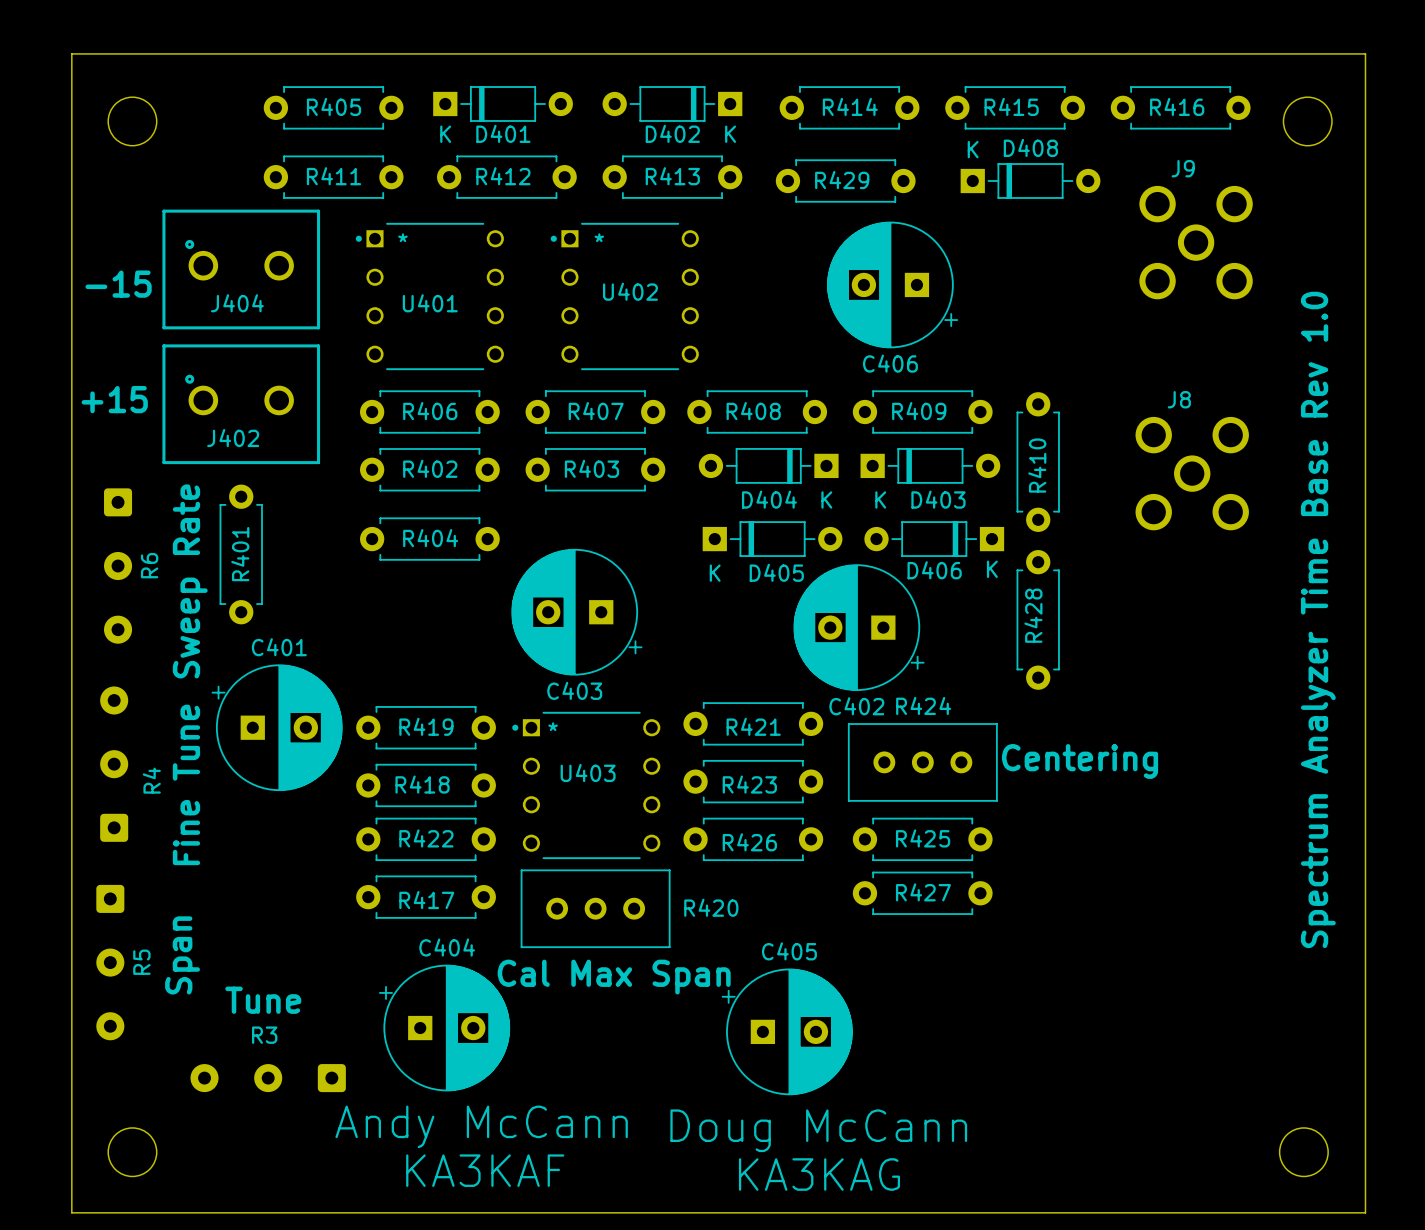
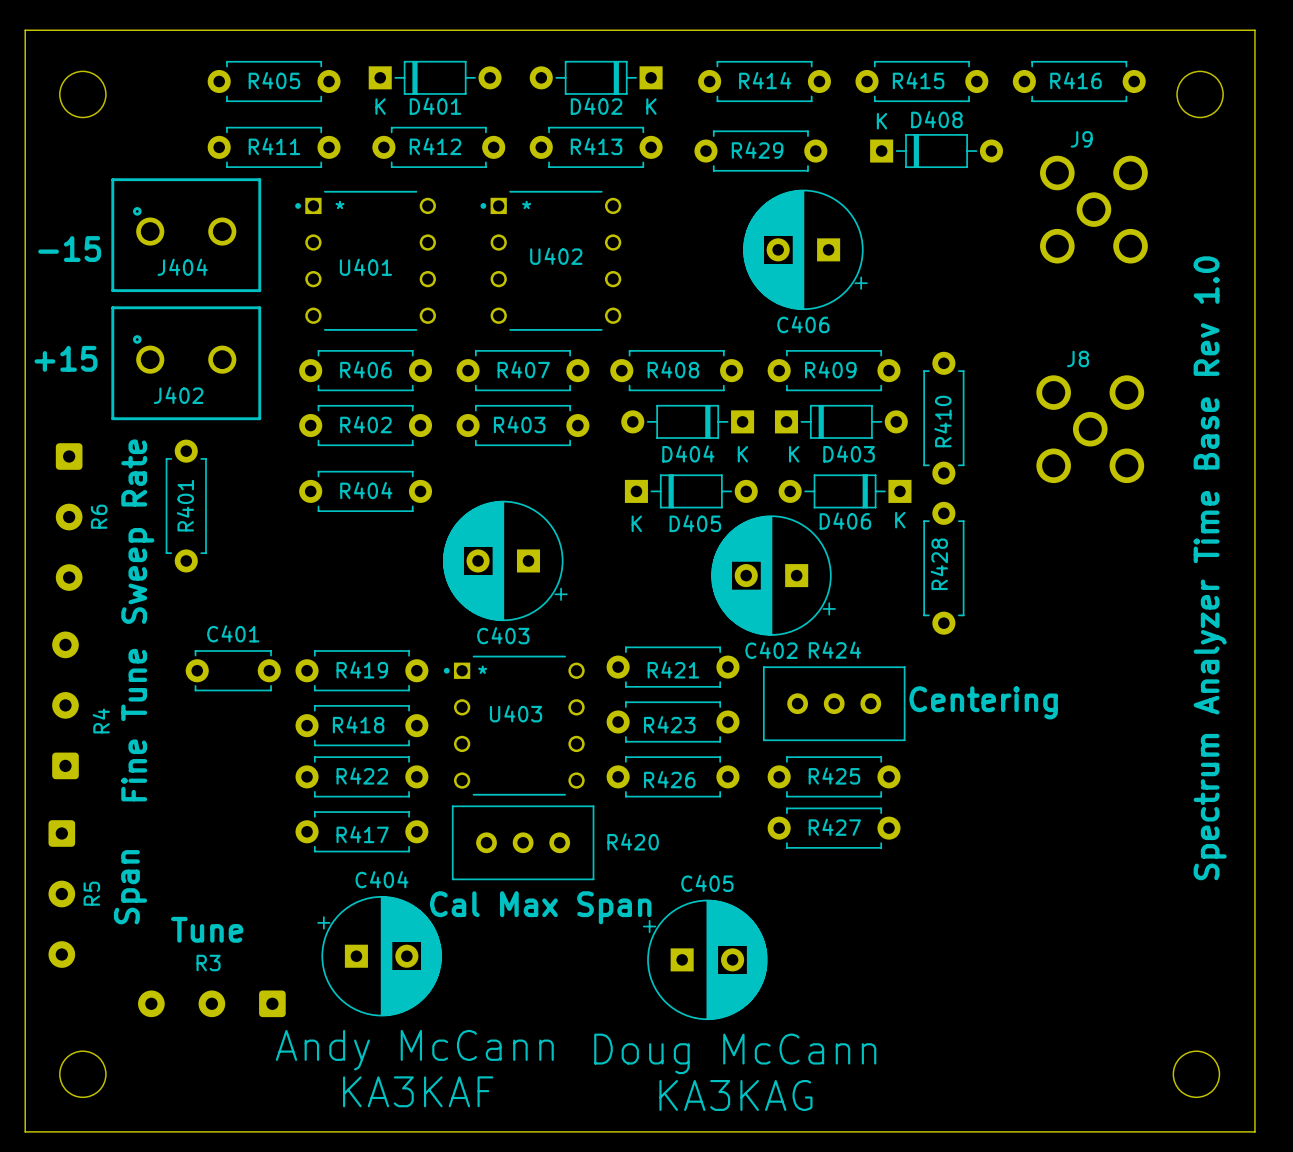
C401 name position: C401 (279, 647) -> C401 (233, 633)
C401 footprint: [211, 664, 343, 792] -> [185, 650, 281, 692]

